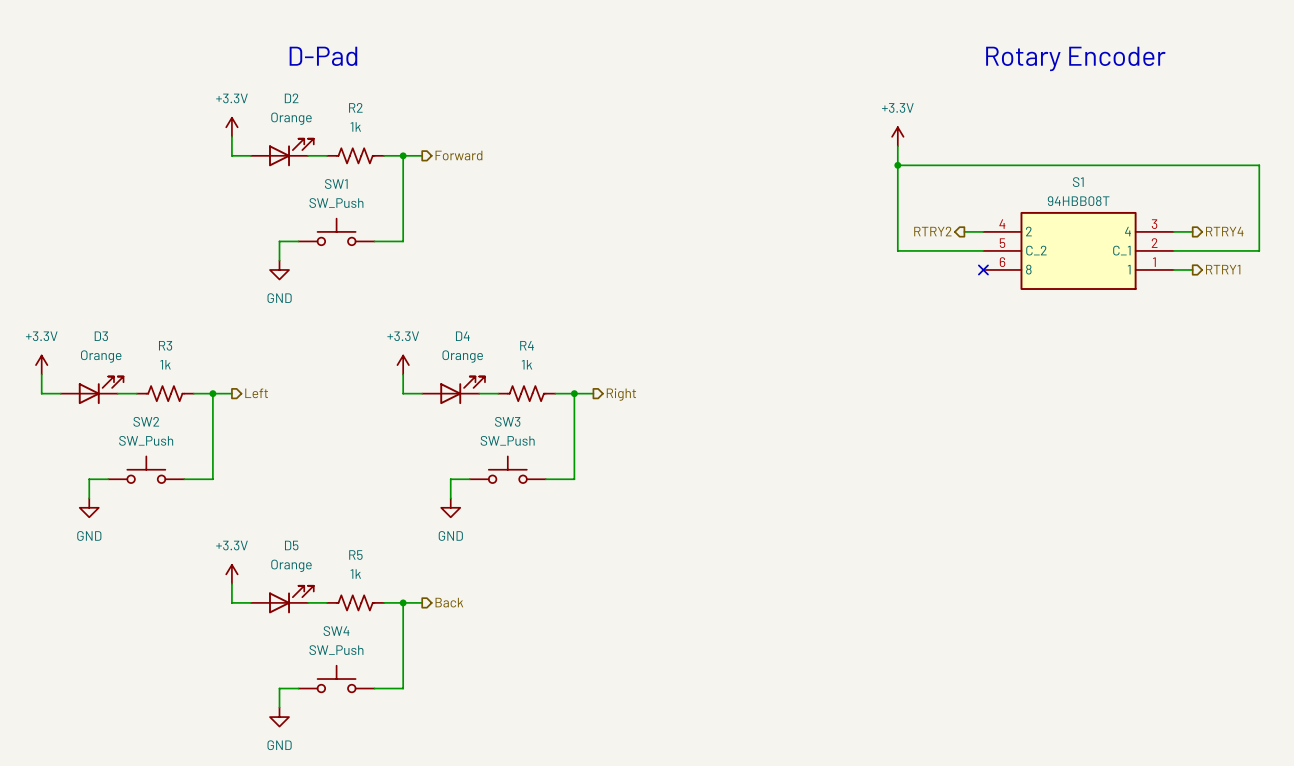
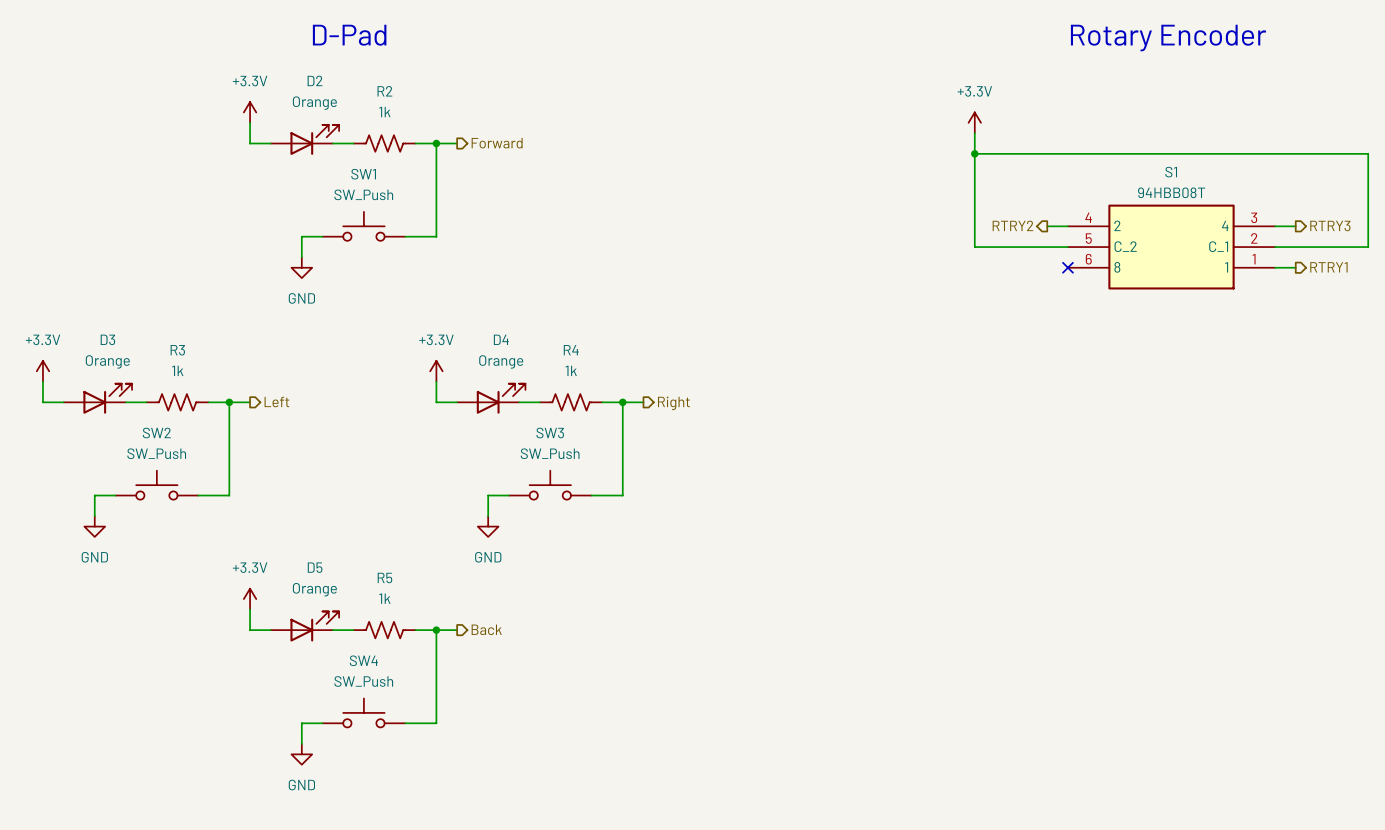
hierarchical label: RTRY4 (1224, 231) -> RTRY3 (1330, 226)

